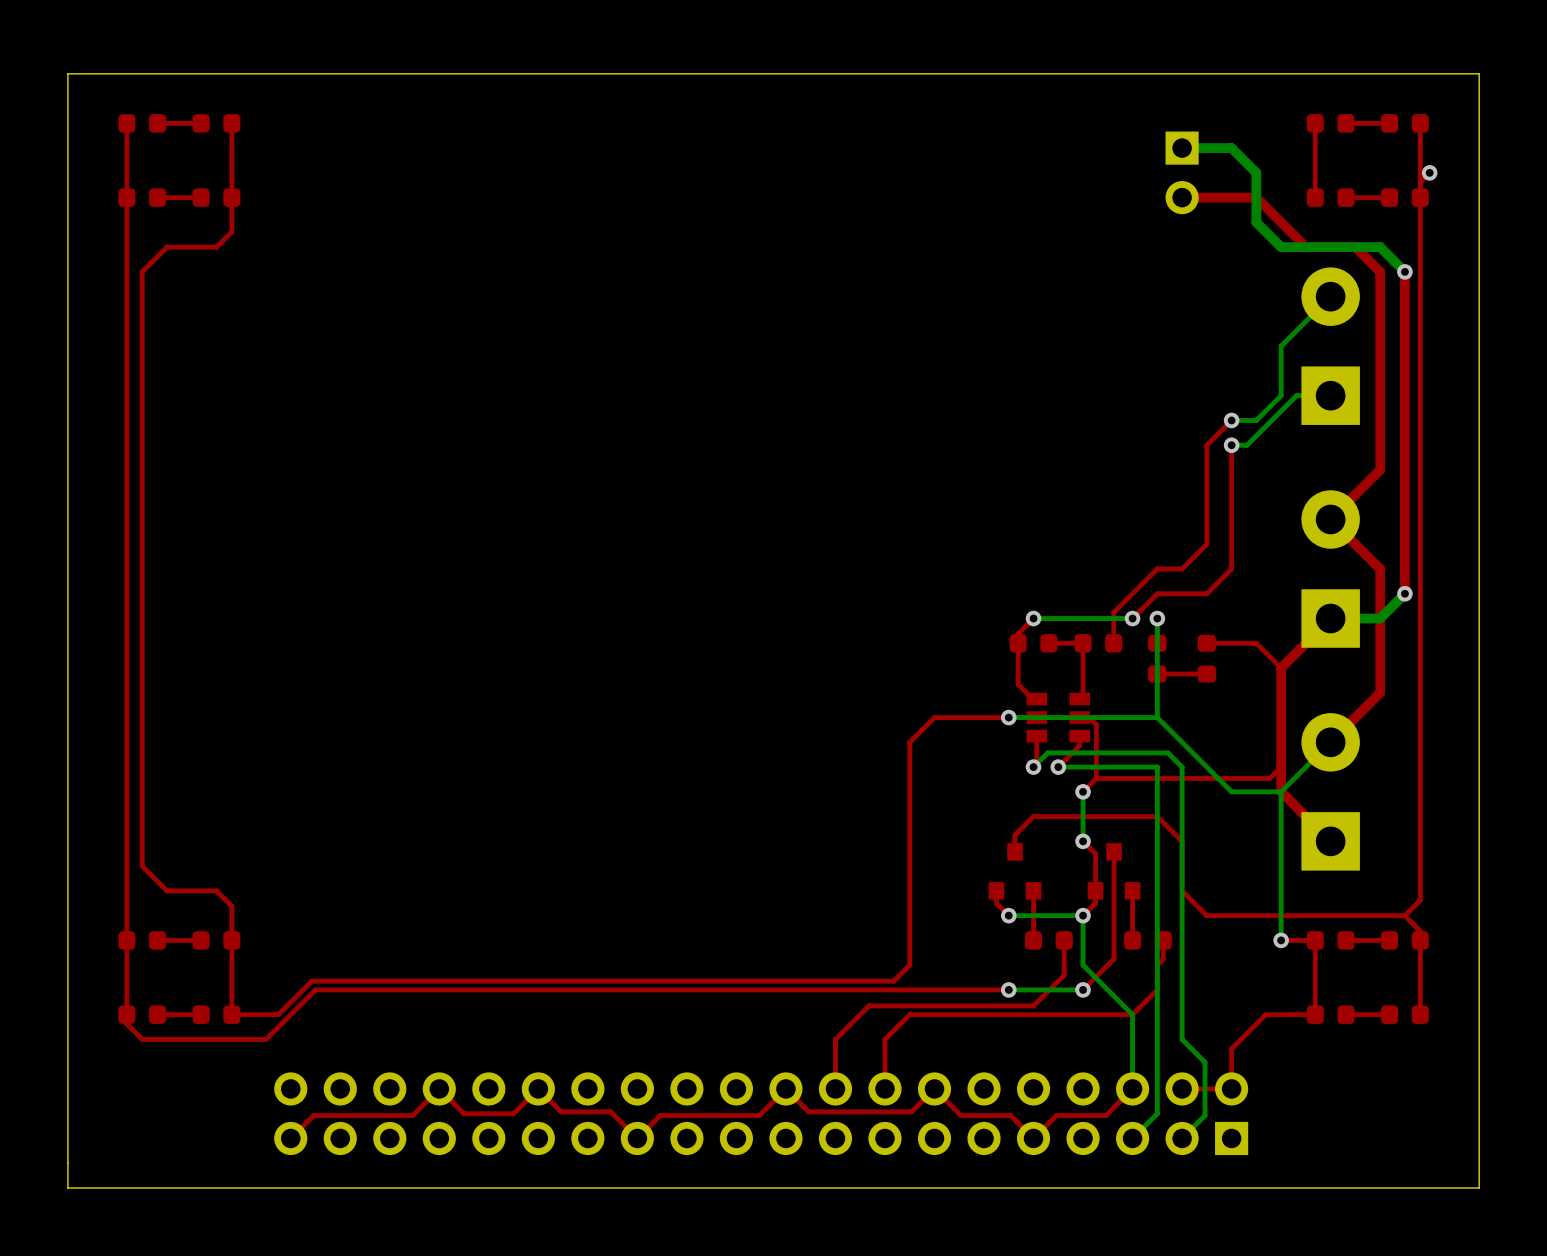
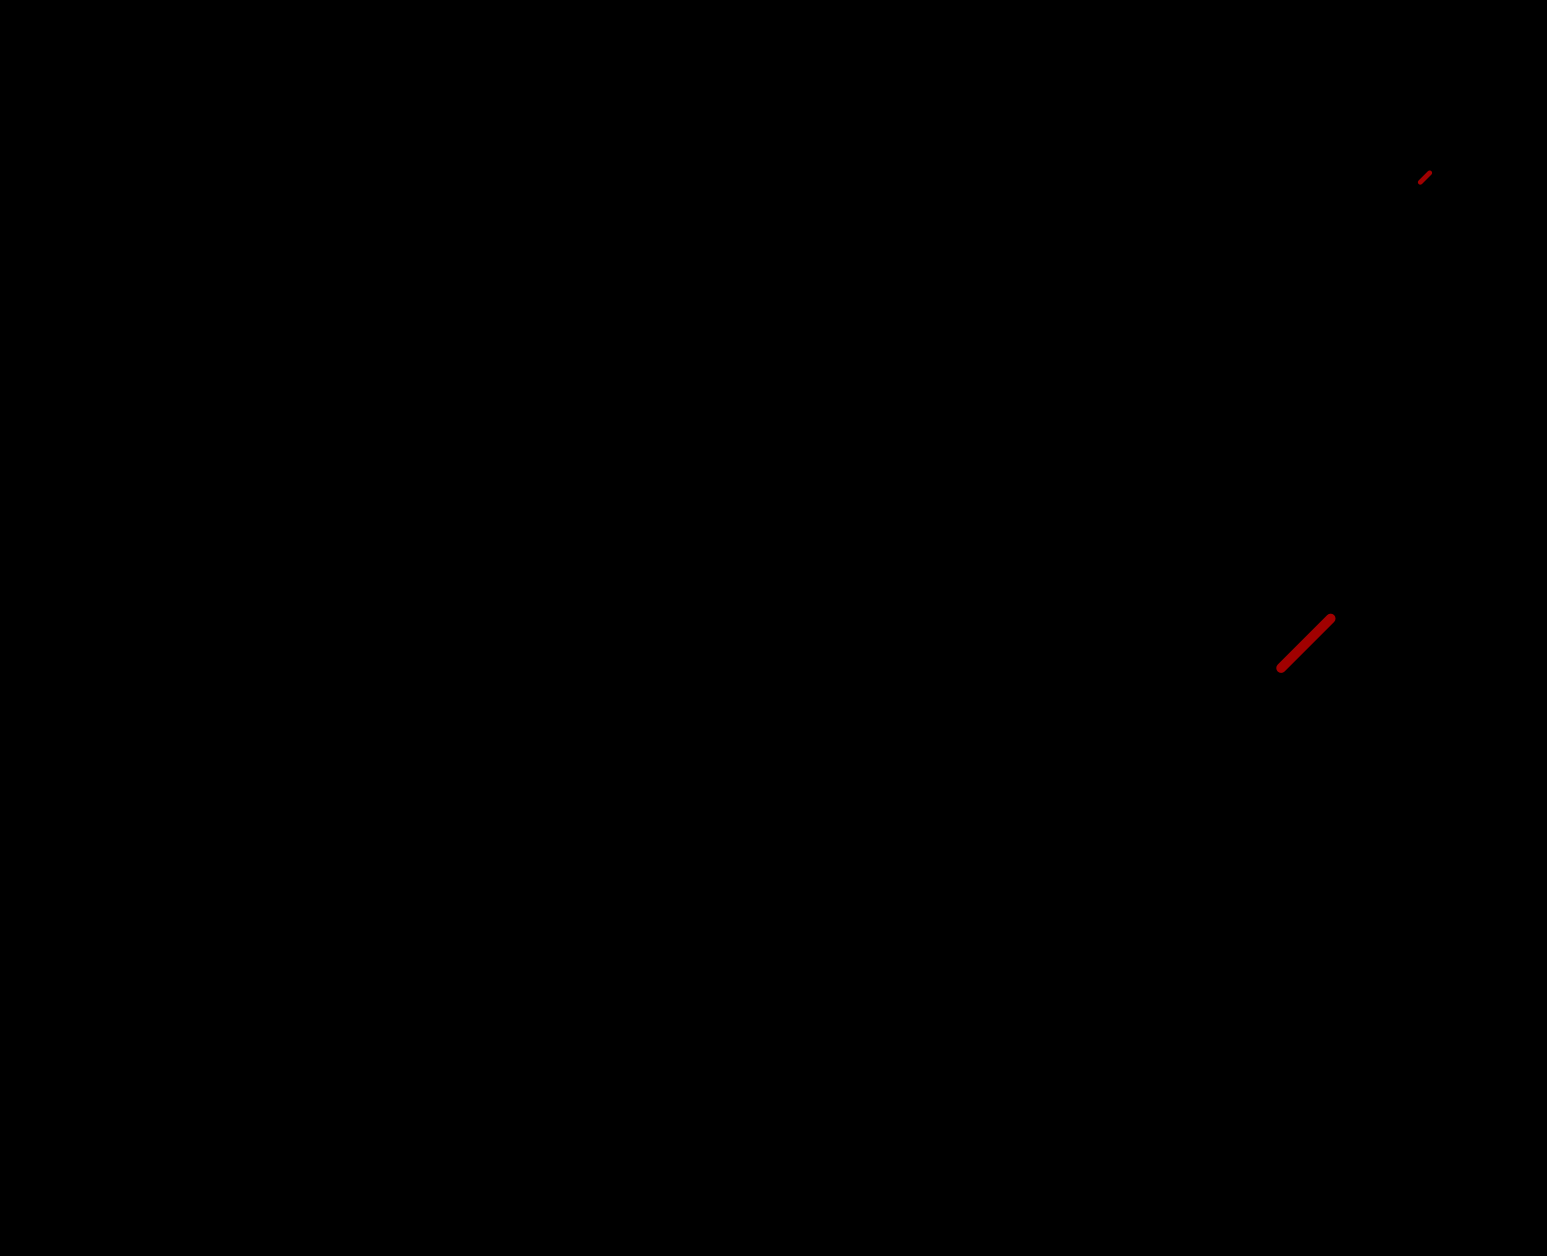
board edge: (1479, 73) (1479, 1187) (67, 1187) (67, 73) (1479, 73) -> none
top track: (126, 123) (126, 1023) (142, 1039) (266, 1039) (315, 989) (1008, 989) -> none
part: (142, 123) -> none
top track: (201, 123) (157, 123) -> none
part: (216, 123) -> none
top track: (231, 123) (231, 231) (216, 247) (166, 247) (142, 271) (142, 866) (166, 890) (216, 890) (231, 906) (231, 1014) (278, 1014) (311, 981) (893, 981) (909, 965) (909, 742) (934, 717) (1036, 717) -> none
top track: (1315, 123) (1315, 197) -> none
part: (1330, 123) -> none
top track: (1389, 123) (1346, 123) -> none
part: (1404, 123) -> none
top track: (1420, 123) (1420, 900) (1404, 915) (1206, 915) (1182, 890) (1182, 841) (1157, 816) (1033, 816) (1015, 835) (1015, 851) -> none
bottom track: (1182, 148) (1231, 148) (1256, 172) (1256, 222) (1281, 247) (1380, 247) (1404, 271) -> none
part: (1182, 172) -> none
via: (1429, 172) -> none
part: (142, 197) -> none
top track: (201, 197) (157, 197) -> none
part: (216, 197) -> none
top track: (1182, 197) (1256, 197) (1305, 247) (1355, 247) (1380, 271) (1380, 469) (1330, 519) (1380, 569) (1380, 692) (1330, 742) -> none
part: (1330, 197) -> none
top track: (1389, 197) (1346, 197) -> none
part: (1404, 197) -> none
top track: (1404, 271) (1404, 593) -> none
via: (1404, 271) -> none
bottom track: (1330, 296) (1281, 346) (1281, 395) (1256, 420) (1231, 420) -> none
part: (1330, 346) -> none
bottom track: (1330, 395) (1296, 395) (1247, 445) (1231, 445) -> none
top track: (1231, 420) (1206, 445) (1206, 544) (1182, 569) (1157, 569) (1113, 612) (1113, 643) -> none
via: (1231, 420) -> none
top track: (1231, 445) (1231, 569) (1206, 593) (1157, 593) (1132, 618) -> none
via: (1231, 445) -> none
part: (1330, 569) -> none
bottom track: (1404, 593) (1380, 618) (1330, 618) -> none
via: (1404, 593) -> none
top track: (1033, 618) (1018, 633) (1018, 684) (1032, 699) (1036, 699) -> none
via: (1033, 618) -> none
bottom track: (1132, 618) (1033, 618) -> none
via: (1132, 618) -> none
bottom track: (1157, 618) (1157, 717) -> none
via: (1157, 618) -> none
part: (1033, 643) -> none
top track: (1048, 643) (1083, 643) (1083, 695) (1079, 699) -> none
part: (1098, 643) -> none
top track: (1206, 643) (1256, 643) (1281, 668) (1281, 791) (1330, 841) -> none
part: (1157, 658) -> none
part: (1206, 658) -> none
top track: (1206, 673) (1157, 673) -> none
via: (1008, 717) -> none
part: (1058, 717) -> none
top track: (1089, 717) (1096, 724) (1096, 778) -> none
bottom track: (1157, 717) (1008, 717) -> none
bottom track: (1157, 717) (1231, 791) (1281, 791) -> none
top track: (1036, 736) (1036, 763) (1033, 767) -> none
top track: (1079, 736) (1079, 745) (1058, 767) -> none
bottom track: (1330, 742) (1281, 791) -> none
bottom track: (1033, 767) (1047, 752) (1167, 752) (1182, 767) (1182, 1039) (1205, 1062) (1205, 1115) (1182, 1138) -> none
via: (1033, 767) -> none
bottom track: (1058, 767) (1157, 767) (1157, 1113) (1132, 1138) -> none
via: (1058, 767) -> none
top track: (1281, 767) (1269, 778) (1096, 778) -> none
top track: (1096, 778) (1083, 791) -> none
bottom track: (1083, 791) (1083, 841) -> none
via: (1083, 791) -> none
bottom track: (1281, 791) (1281, 940) -> none
part: (1330, 791) -> none
top track: (1083, 841) (1095, 853) (1095, 903) (1083, 915) -> none
via: (1083, 841) -> none
top track: (1114, 851) (1114, 958) (1083, 989) -> none
part: (1015, 871) -> none
part: (1114, 871) -> none
top track: (996, 890) (996, 903) (1008, 915) -> none
top track: (1033, 890) (1033, 940) -> none
top track: (1132, 890) (1132, 940) -> none
bottom track: (1008, 915) (1083, 915) (1083, 965) (1132, 1014) (1132, 1088) -> none
via: (1008, 915) -> none
via: (1083, 915) -> none
top track: (1404, 915) (1420, 931) (1420, 1014) -> none
part: (142, 940) -> none
top track: (201, 940) (157, 940) -> none
part: (216, 940) -> none
part: (1048, 940) -> none
top track: (1064, 940) (1064, 975) (1033, 1005) (869, 1005) (835, 1039) (835, 1088) -> none
part: (1147, 940) -> none
top track: (1163, 940) (1163, 959) (1157, 965) (1157, 989) (1132, 1014) (909, 1014) (884, 1039) (884, 1088) -> none
top track: (1281, 940) (1315, 940) (1315, 1014) (1265, 1014) (1231, 1048) (1231, 1088) (1182, 1088) -> none
via: (1281, 940) -> none
part: (1330, 940) -> none
top track: (1389, 940) (1346, 940) -> none
part: (1404, 940) -> none
via: (1008, 989) -> none
bottom track: (1083, 989) (1008, 989) -> none
via: (1083, 989) -> none
part: (142, 1014) -> none
top track: (201, 1014) (157, 1014) -> none
part: (216, 1014) -> none
part: (1330, 1014) -> none
top track: (1389, 1014) (1346, 1014) -> none
part: (1404, 1014) -> none
top track: (1132, 1088) (1105, 1115) (1056, 1115) (1033, 1138) (1010, 1115) (961, 1115) (934, 1088) (911, 1111) (808, 1111) (785, 1088) (759, 1115) (660, 1115) (637, 1138) (610, 1111) (561, 1111) (538, 1088) (513, 1113) (464, 1113) (439, 1088) (412, 1115) (313, 1115) (290, 1138) -> none
part: (761, 1113) -> none

